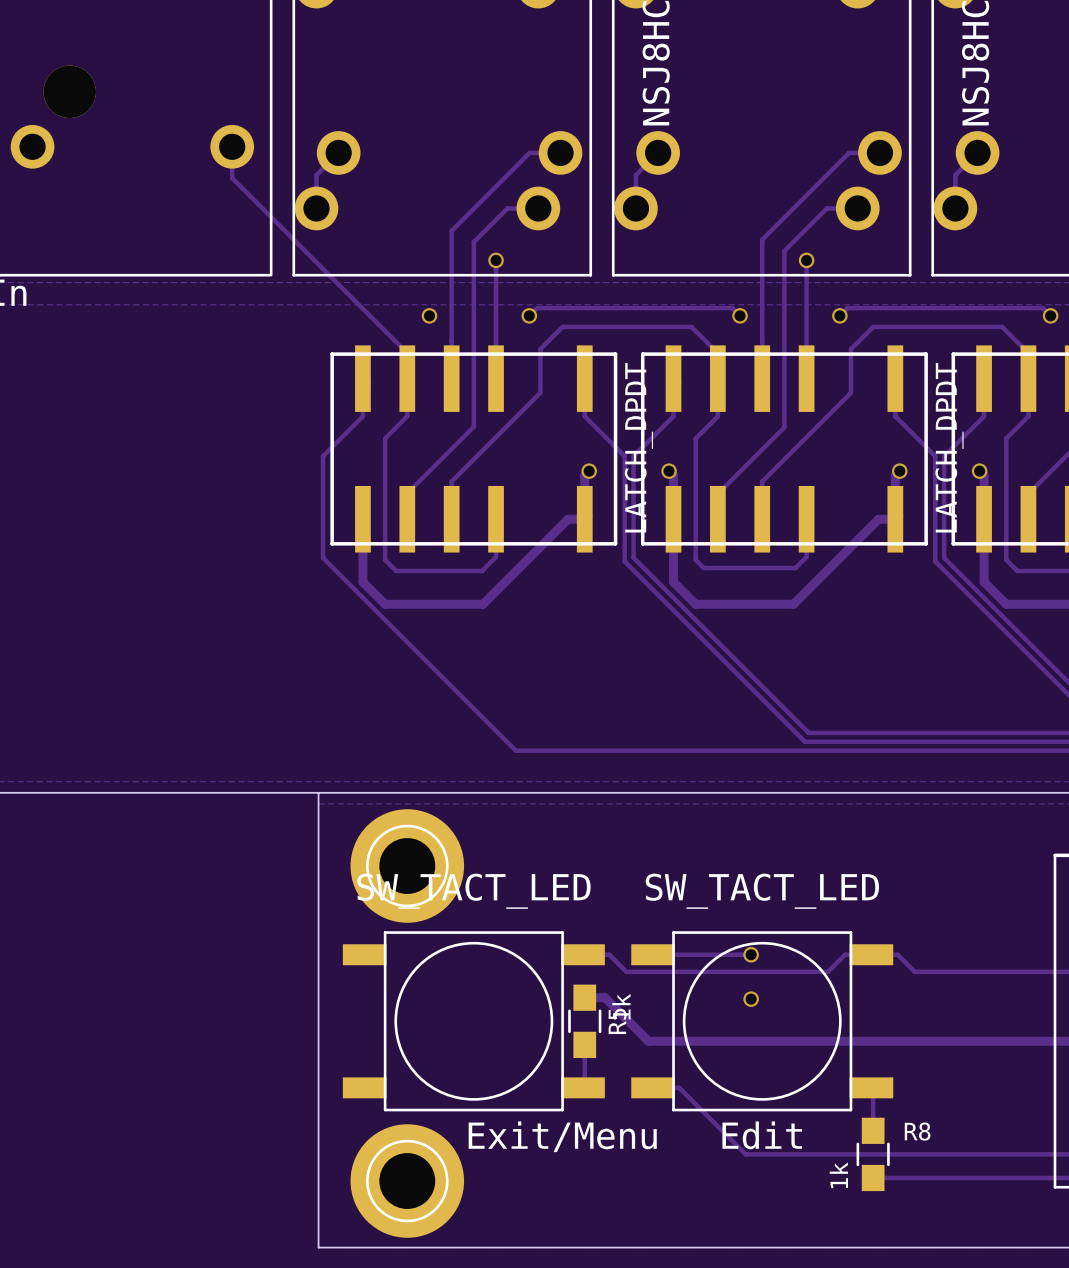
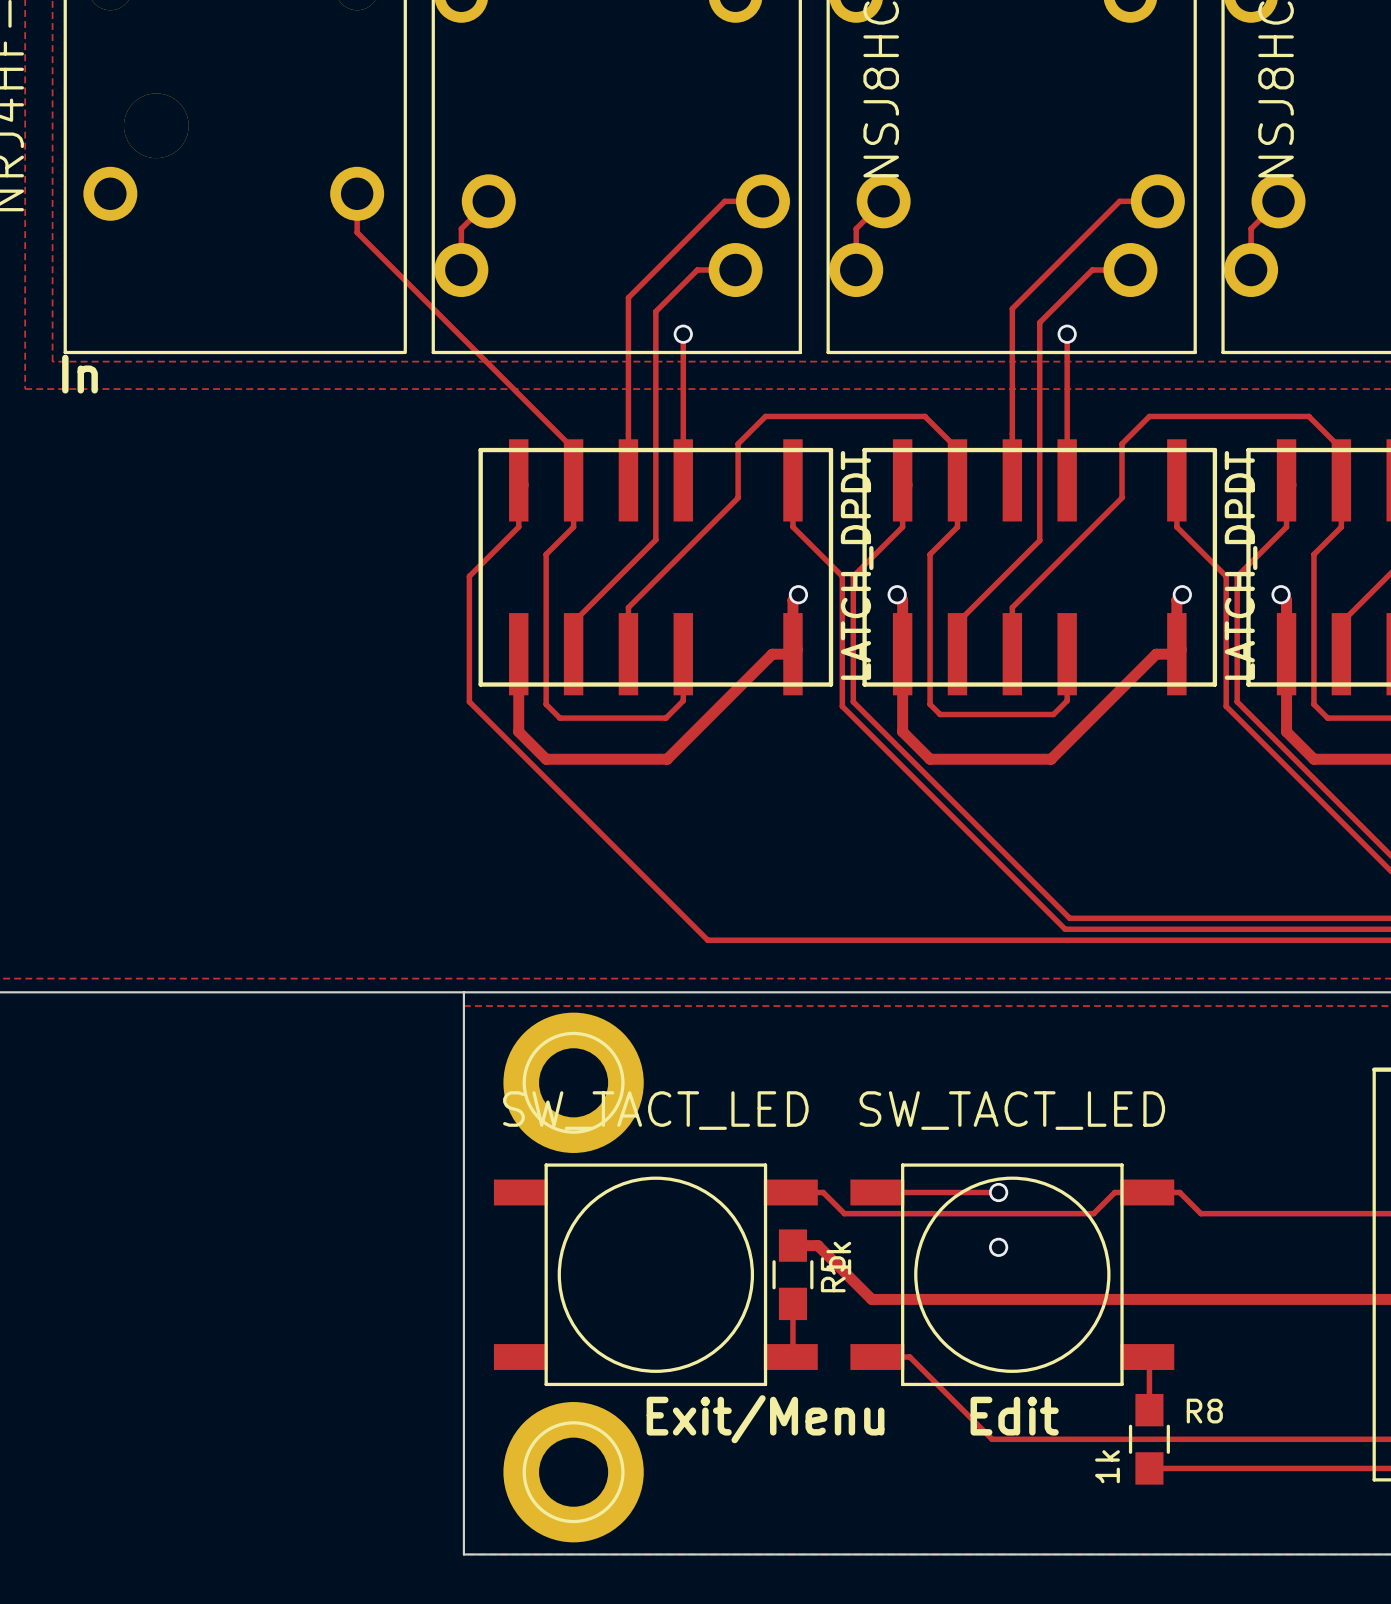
via: (429, 315) -> none
track: (529, 315) (537, 308) (732, 308) (740, 315) -> none
via: (529, 315) -> none
via: (740, 315) -> none
track: (839, 315) (847, 308) (1042, 308) (1050, 315) -> none
via: (839, 315) -> none
via: (1050, 315) -> none

